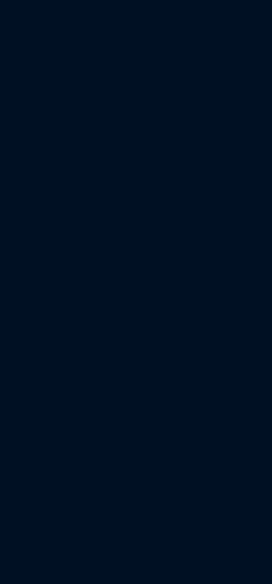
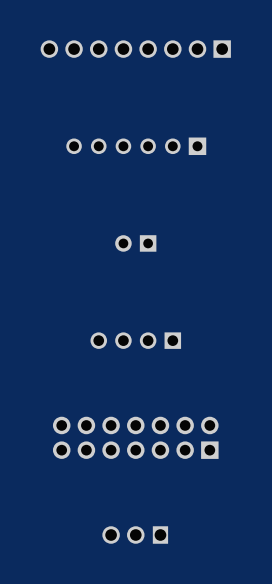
part: none -> (135, 49)
part: none -> (136, 146)
part: none -> (135, 243)
part: none -> (135, 340)
part: none -> (135, 437)
part: none -> (135, 535)

